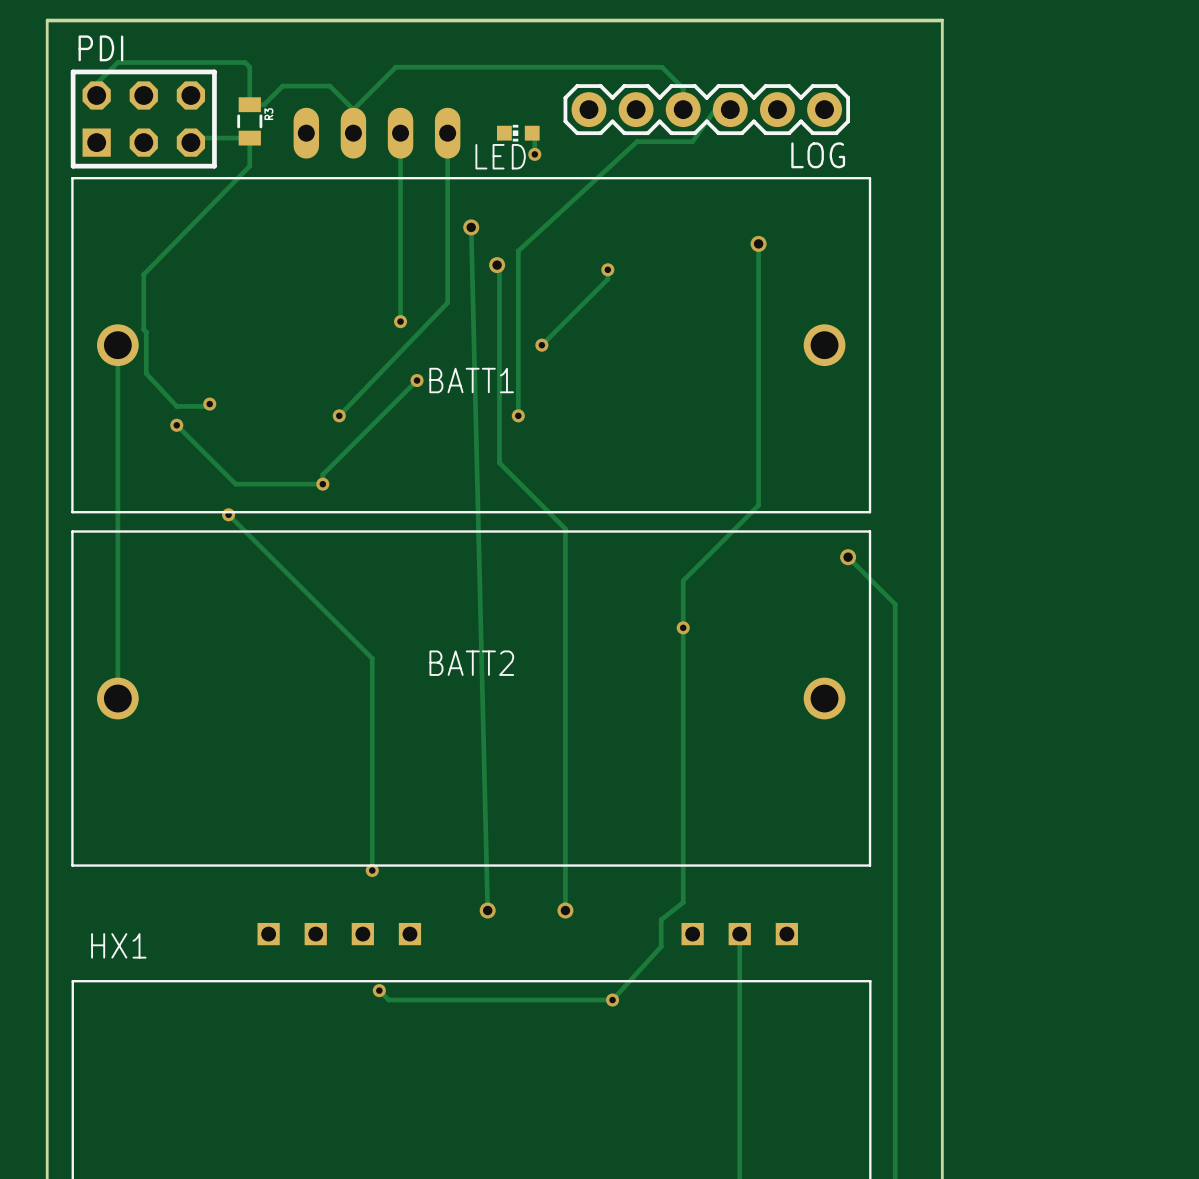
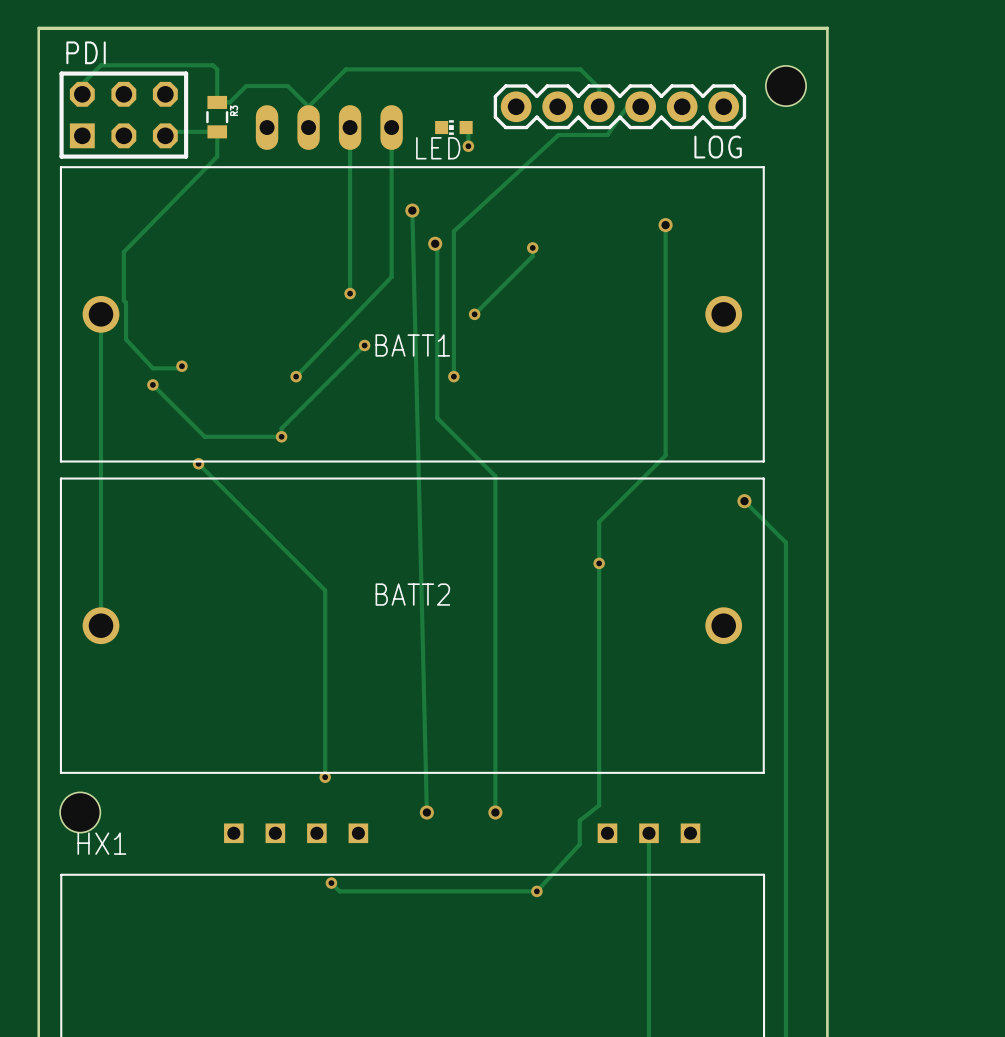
hole: none -> (785, 86)
hole: none -> (80, 812)

